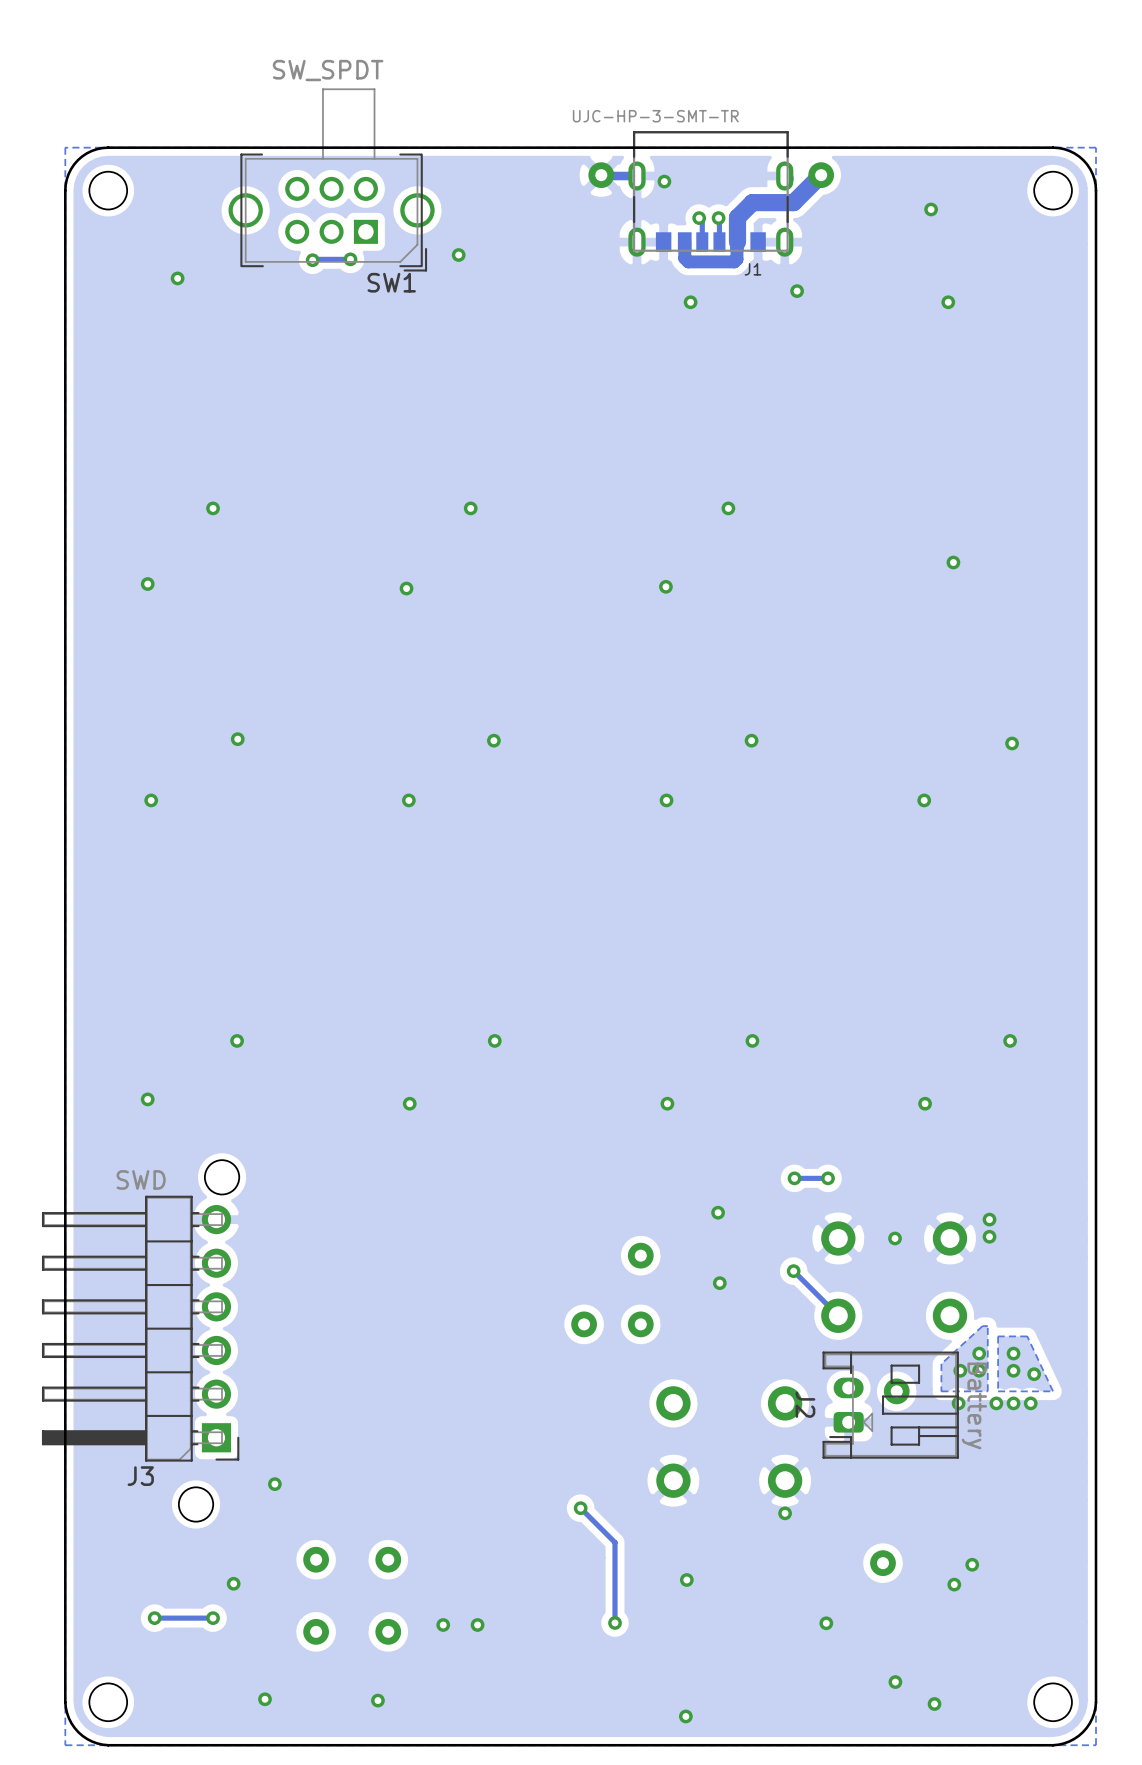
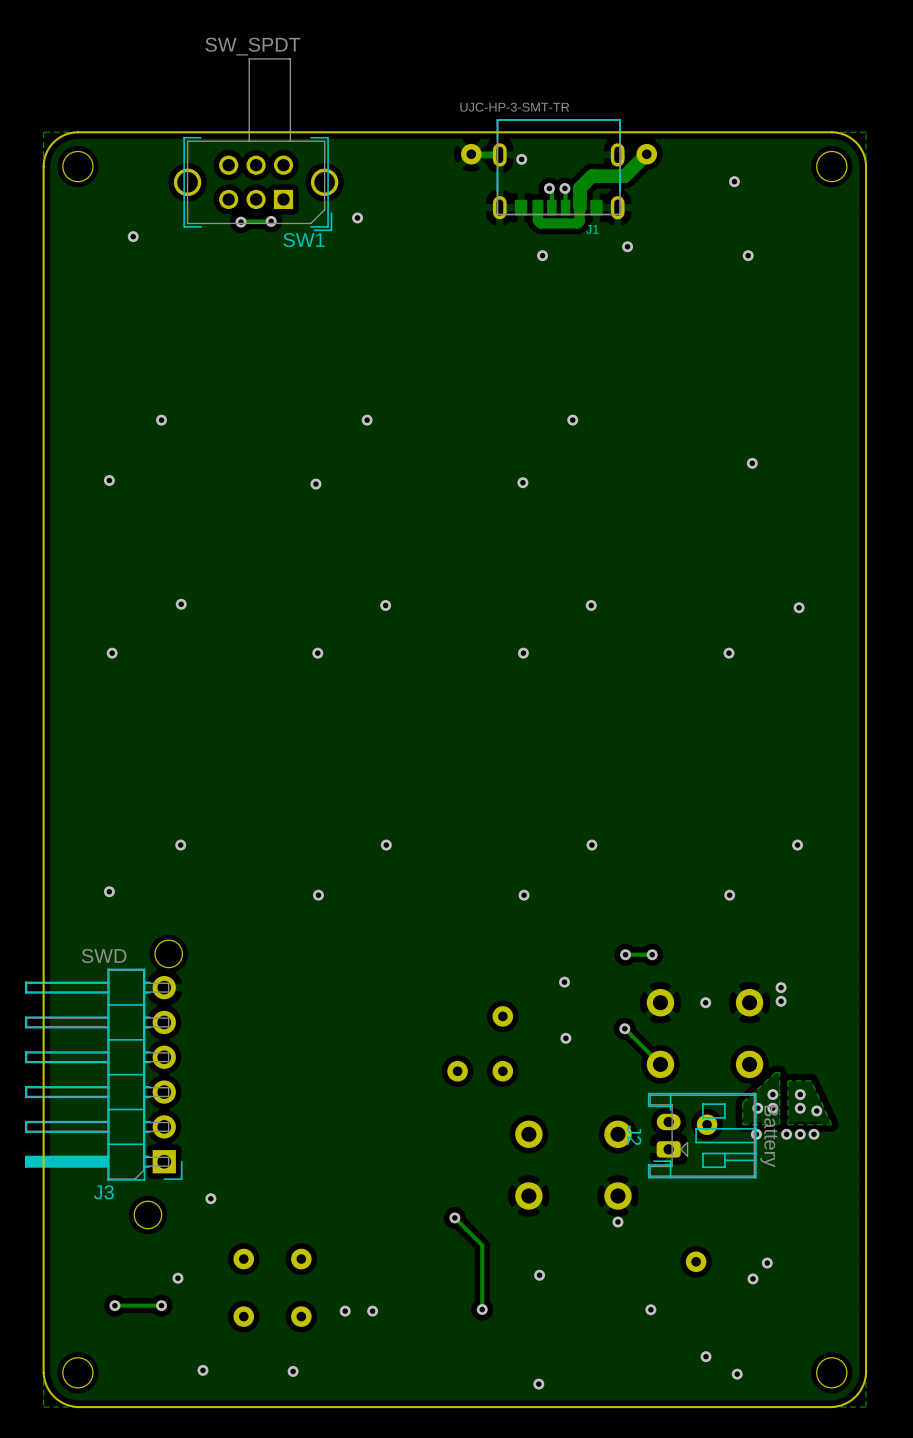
SW1 footprint: [228, 88, 435, 272] -> [173, 58, 339, 232]

